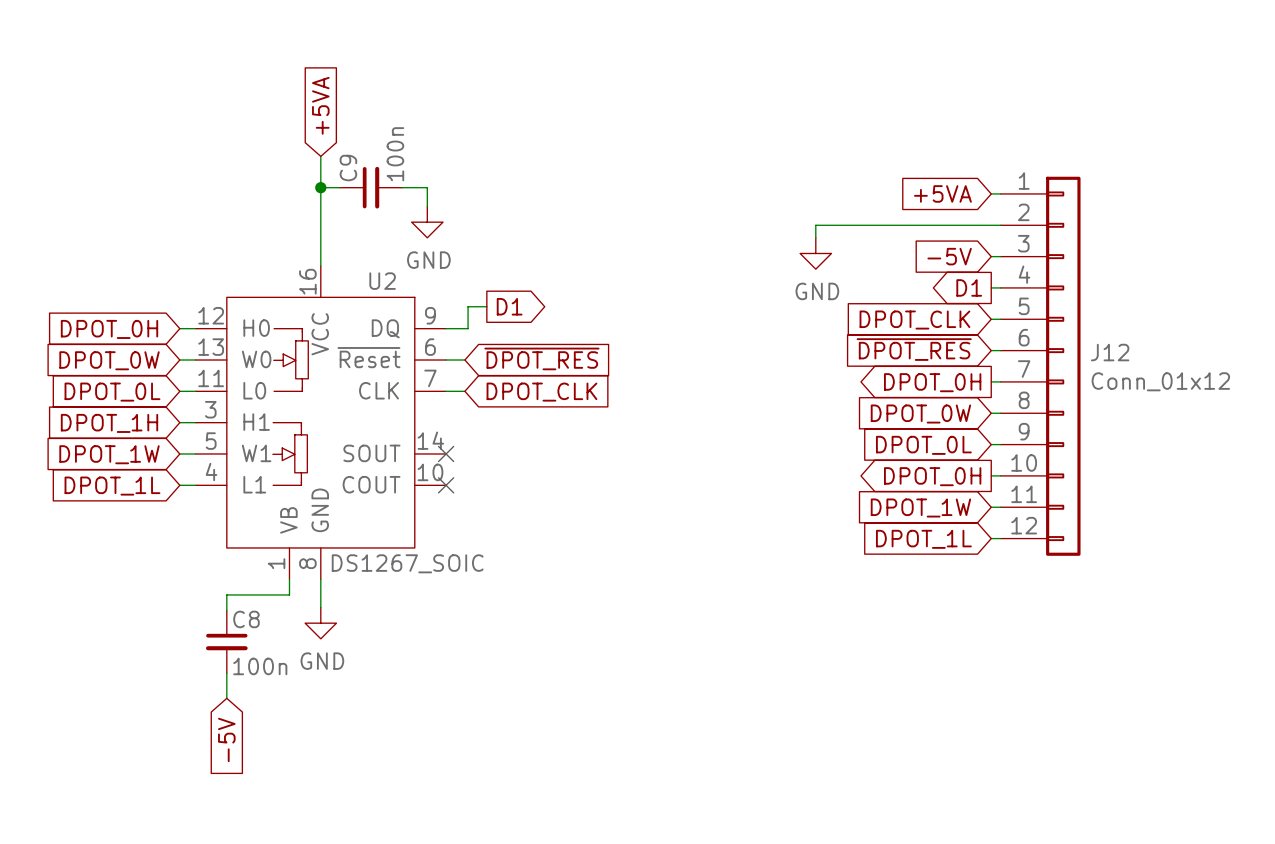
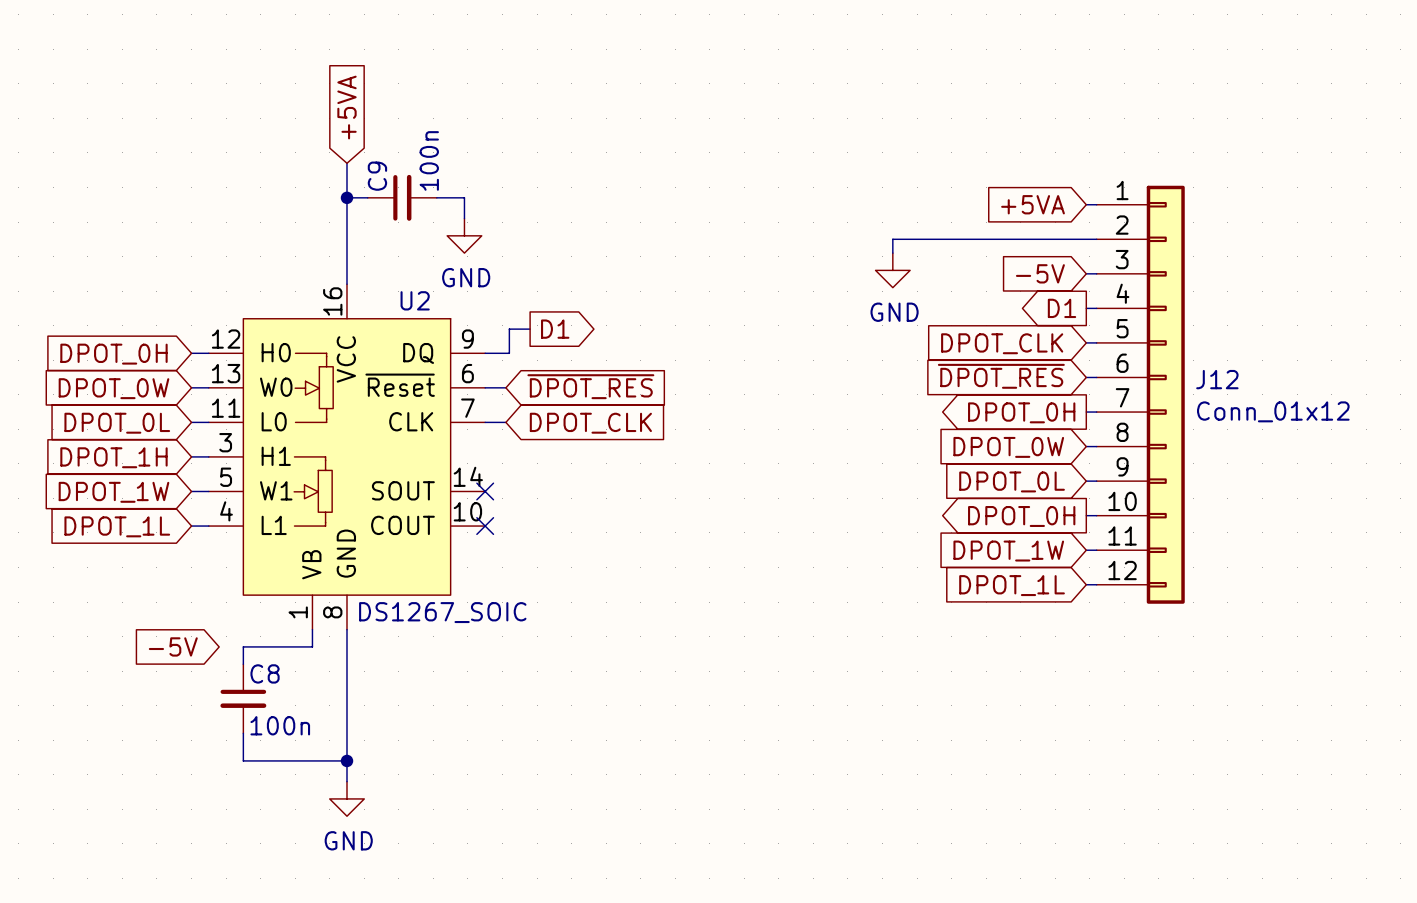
wire: none -> (346, 660) (346, 781)
power symbol position: GND (320, 623) -> GND (346, 798)
wire: none -> (243, 760) (346, 760)
junction: none -> (346, 760)
global label rotation: 0° (226, 739) -> 90° clockwise (173, 646)
global label position: -5V (226, 739) -> -5V (173, 646)

